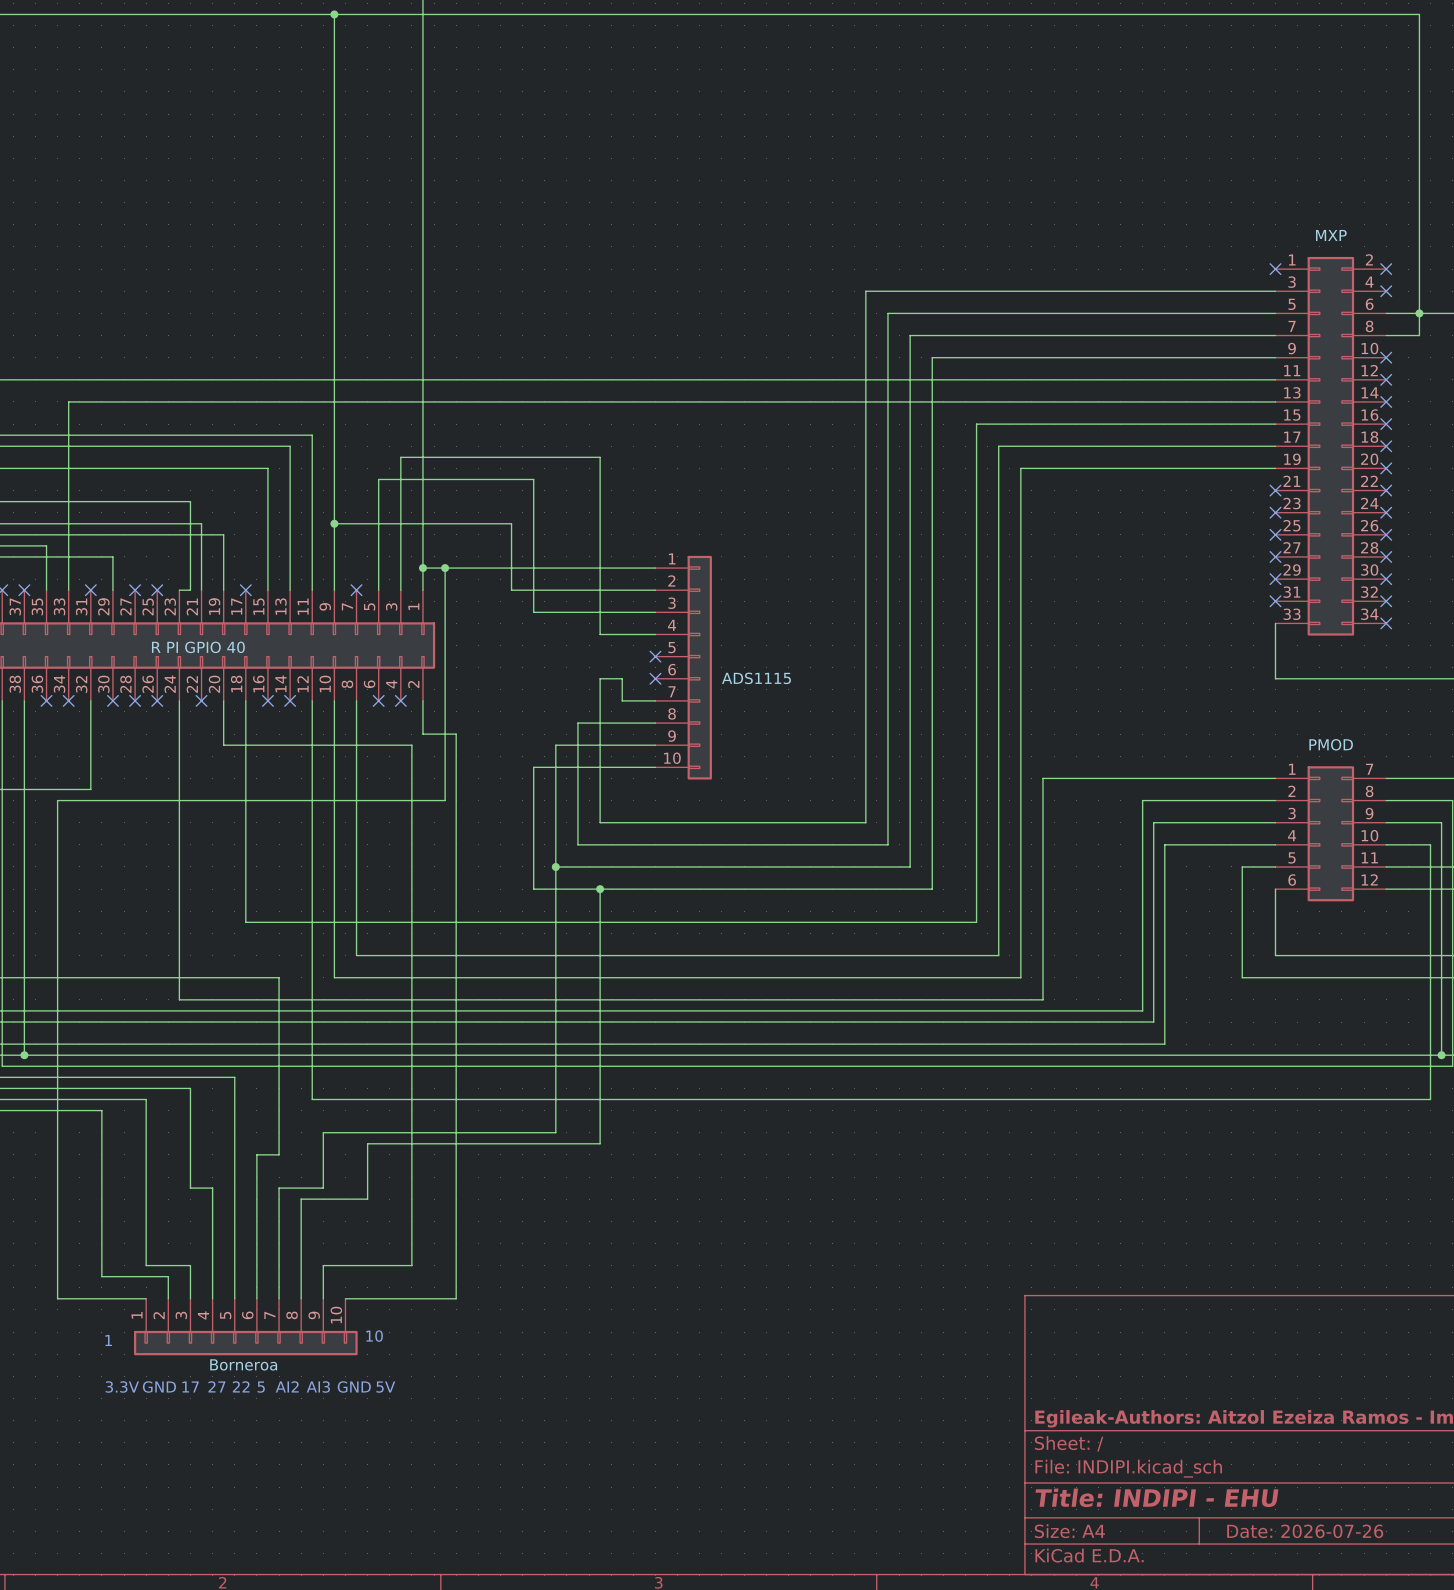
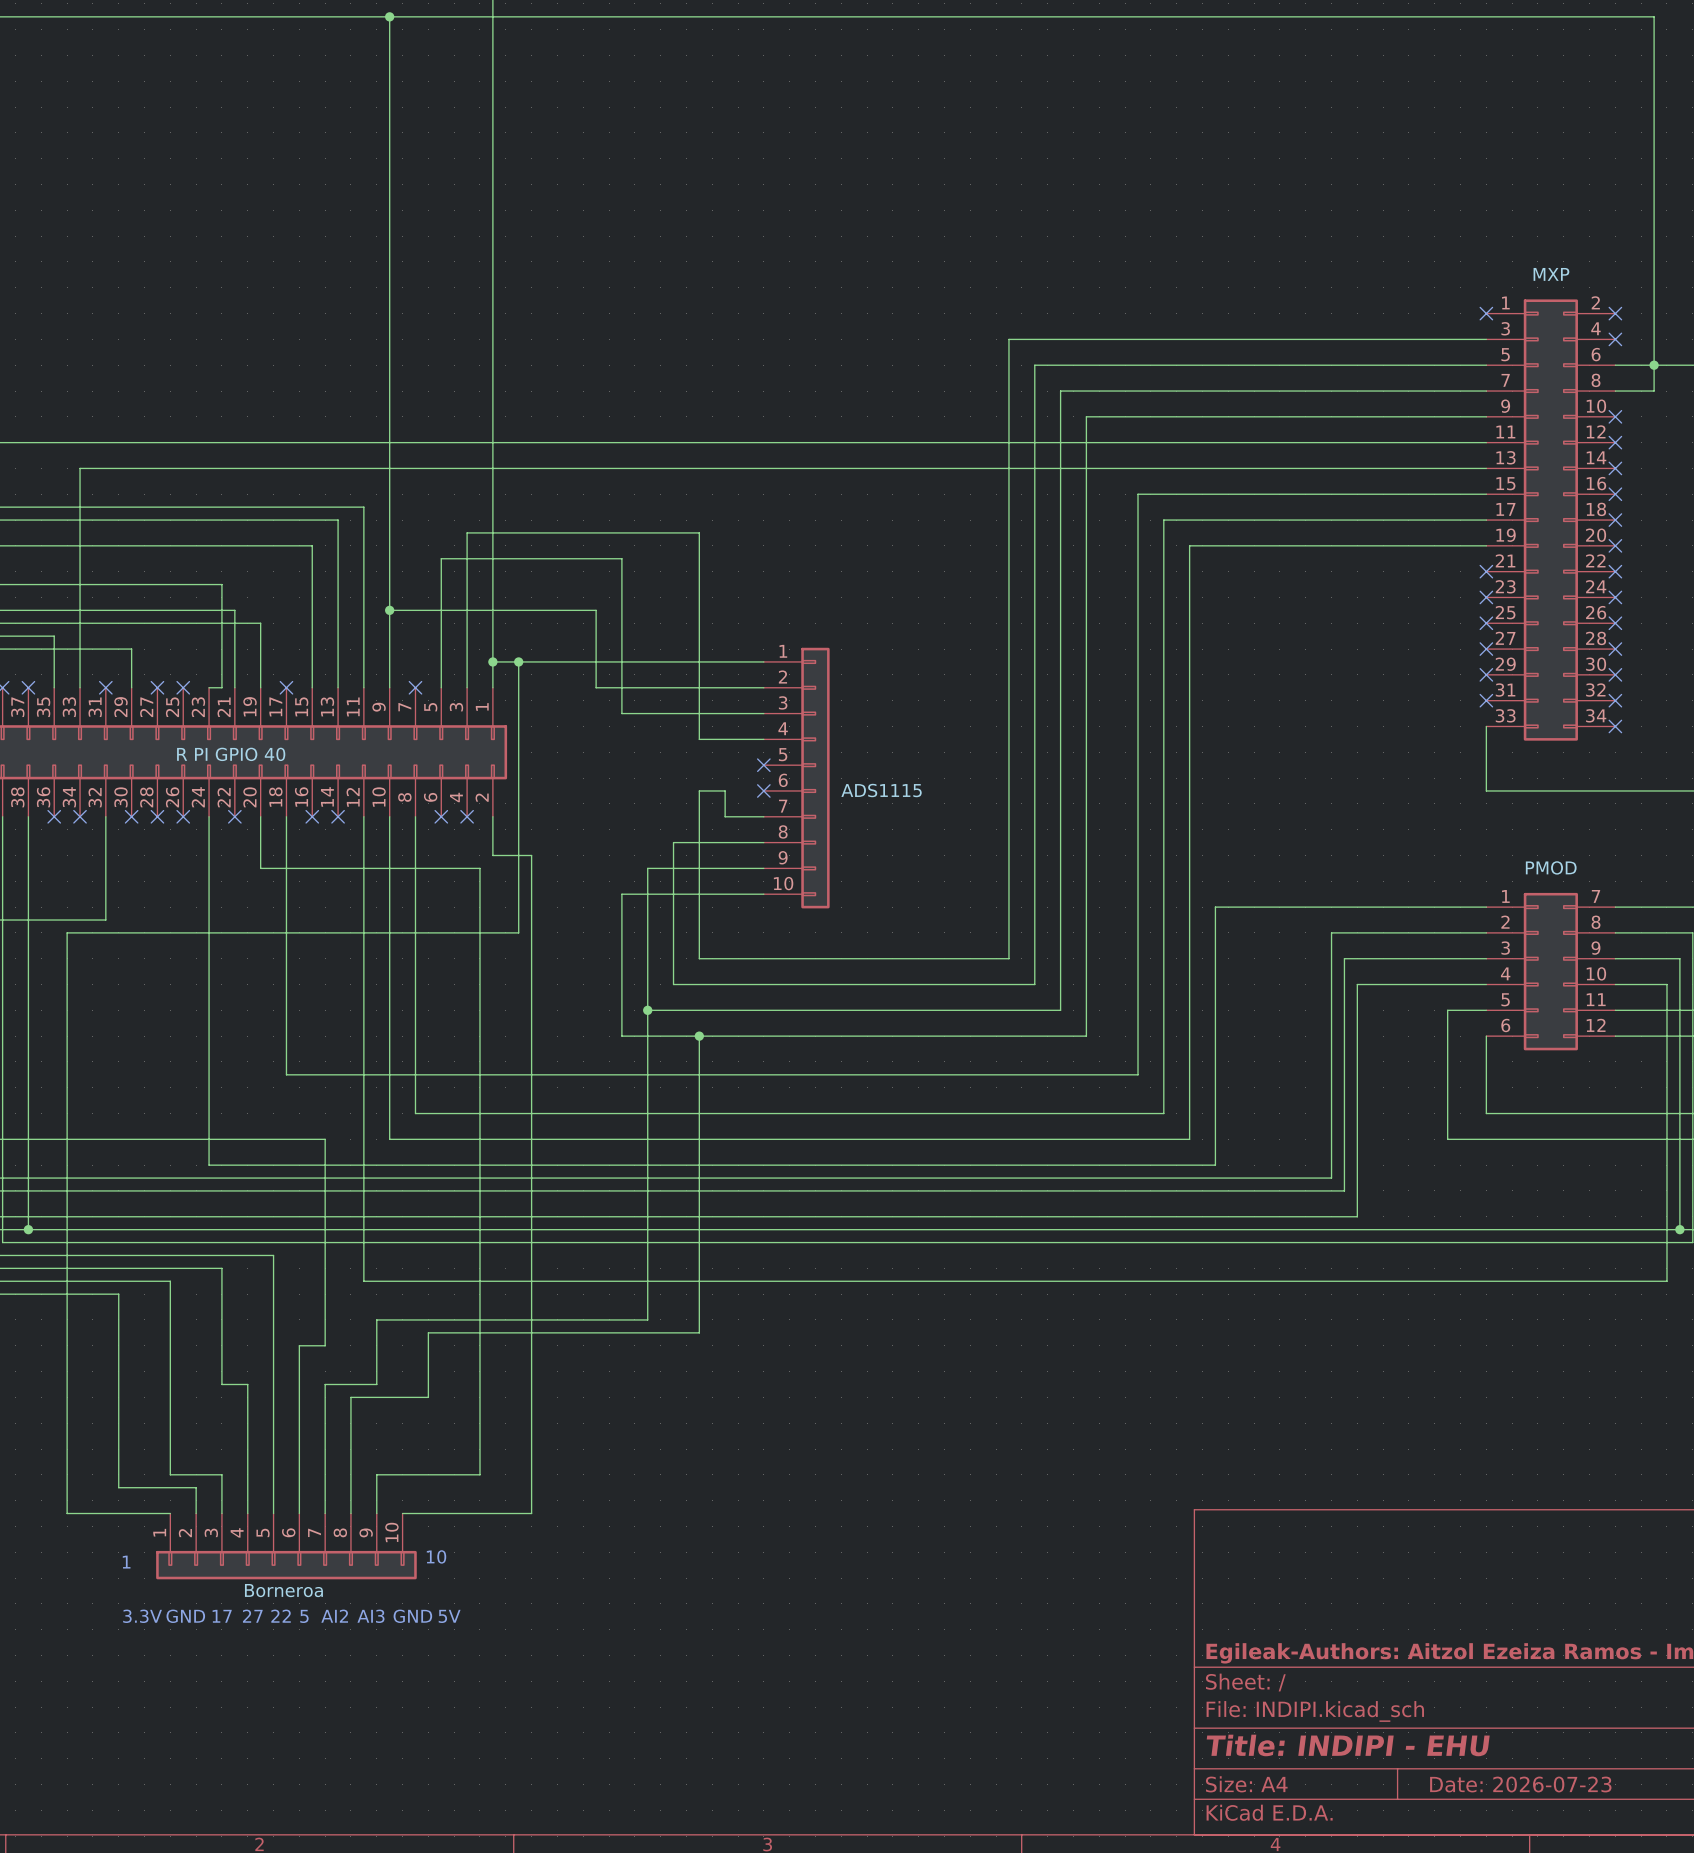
title block: Date: 2026-07-26 (1305, 1531) -> Date: 2026-07-23 (1520, 1784)

